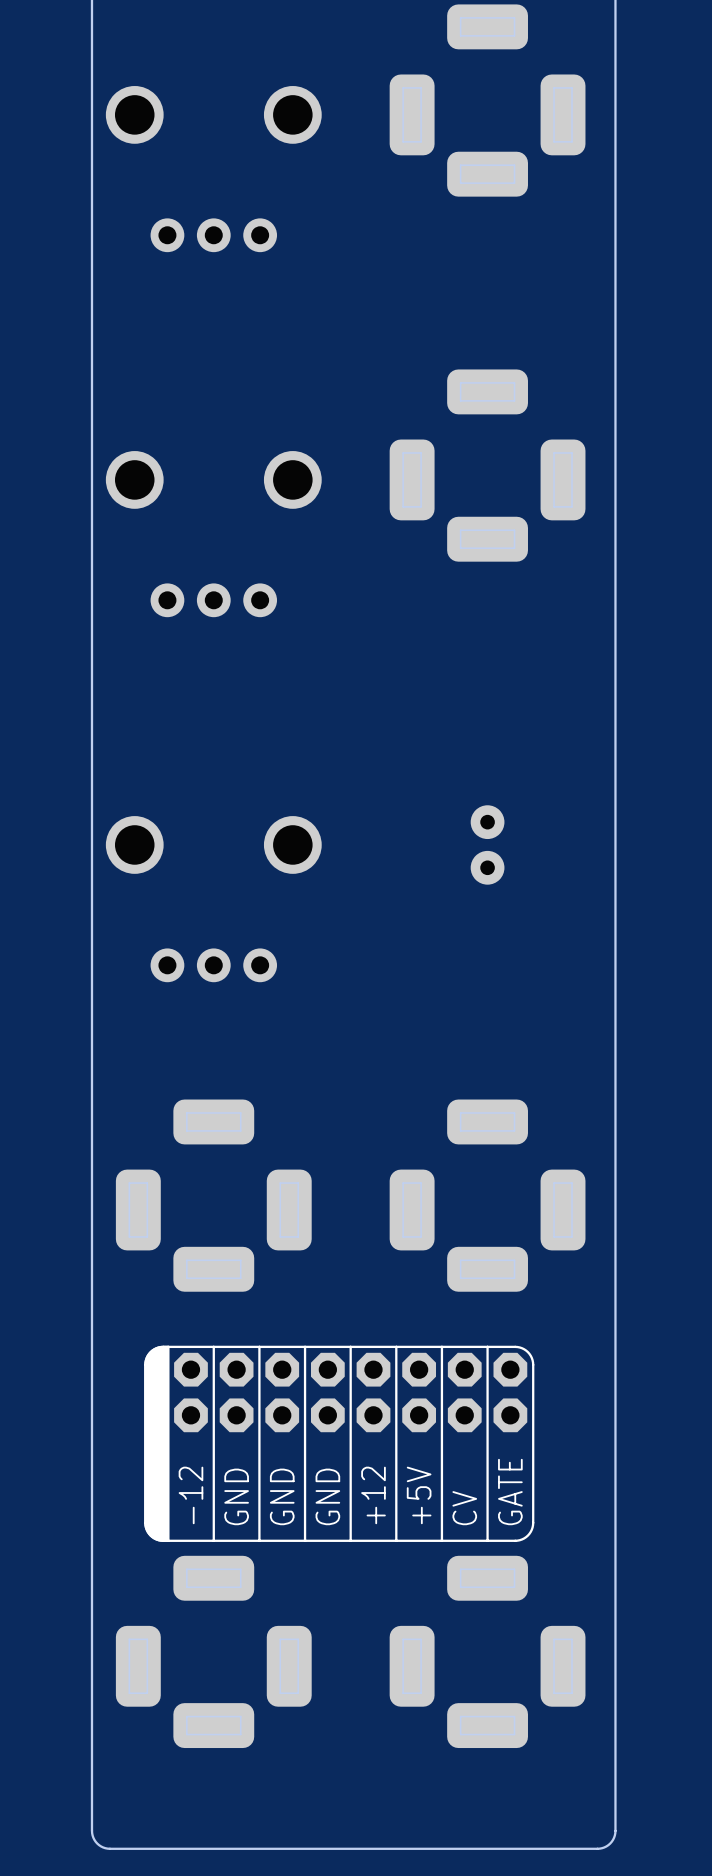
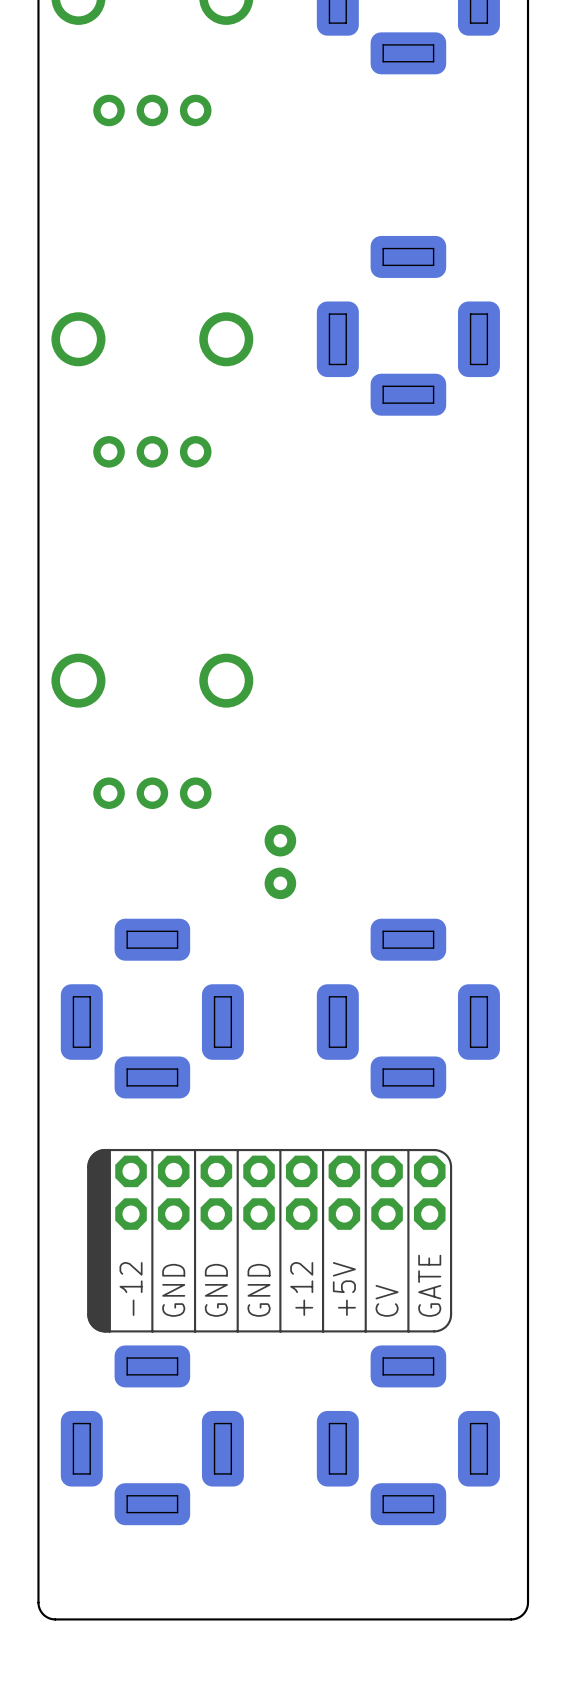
part position: (487, 844) -> (280, 862)

